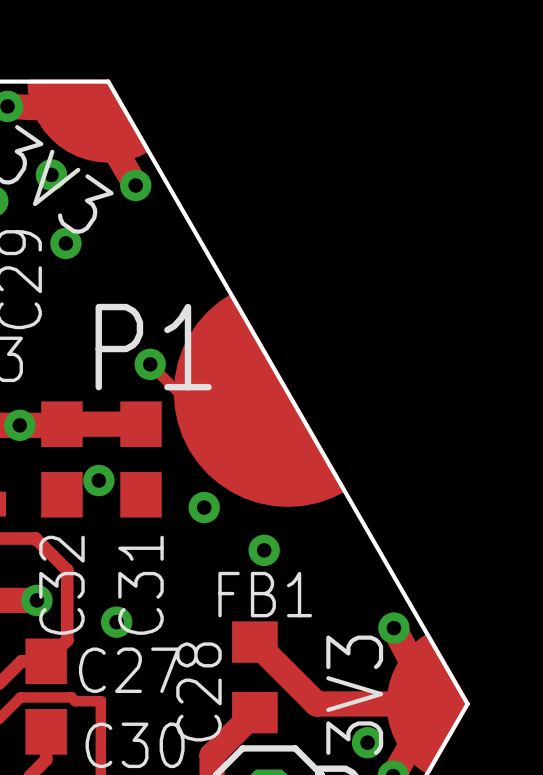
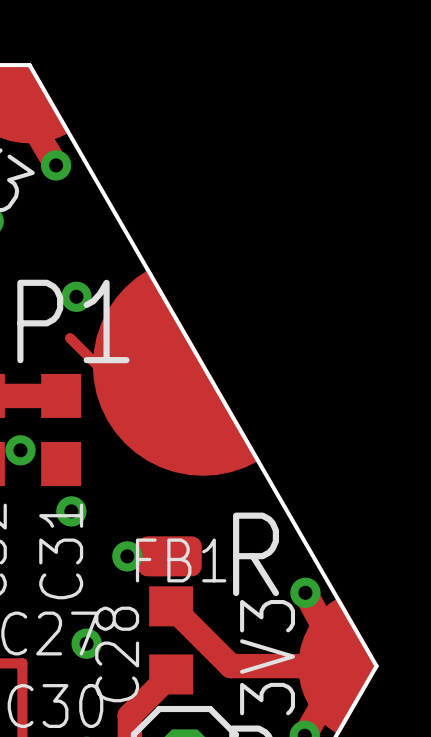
via position: (150, 364) -> (76, 296)
via: (204, 507) -> none
via: none -> (71, 511)
via: (264, 550) -> none
via: none -> (127, 556)
R: none -> (169, 556)
via: (116, 622) -> none
via: none -> (86, 643)
via: (367, 742) -> none

